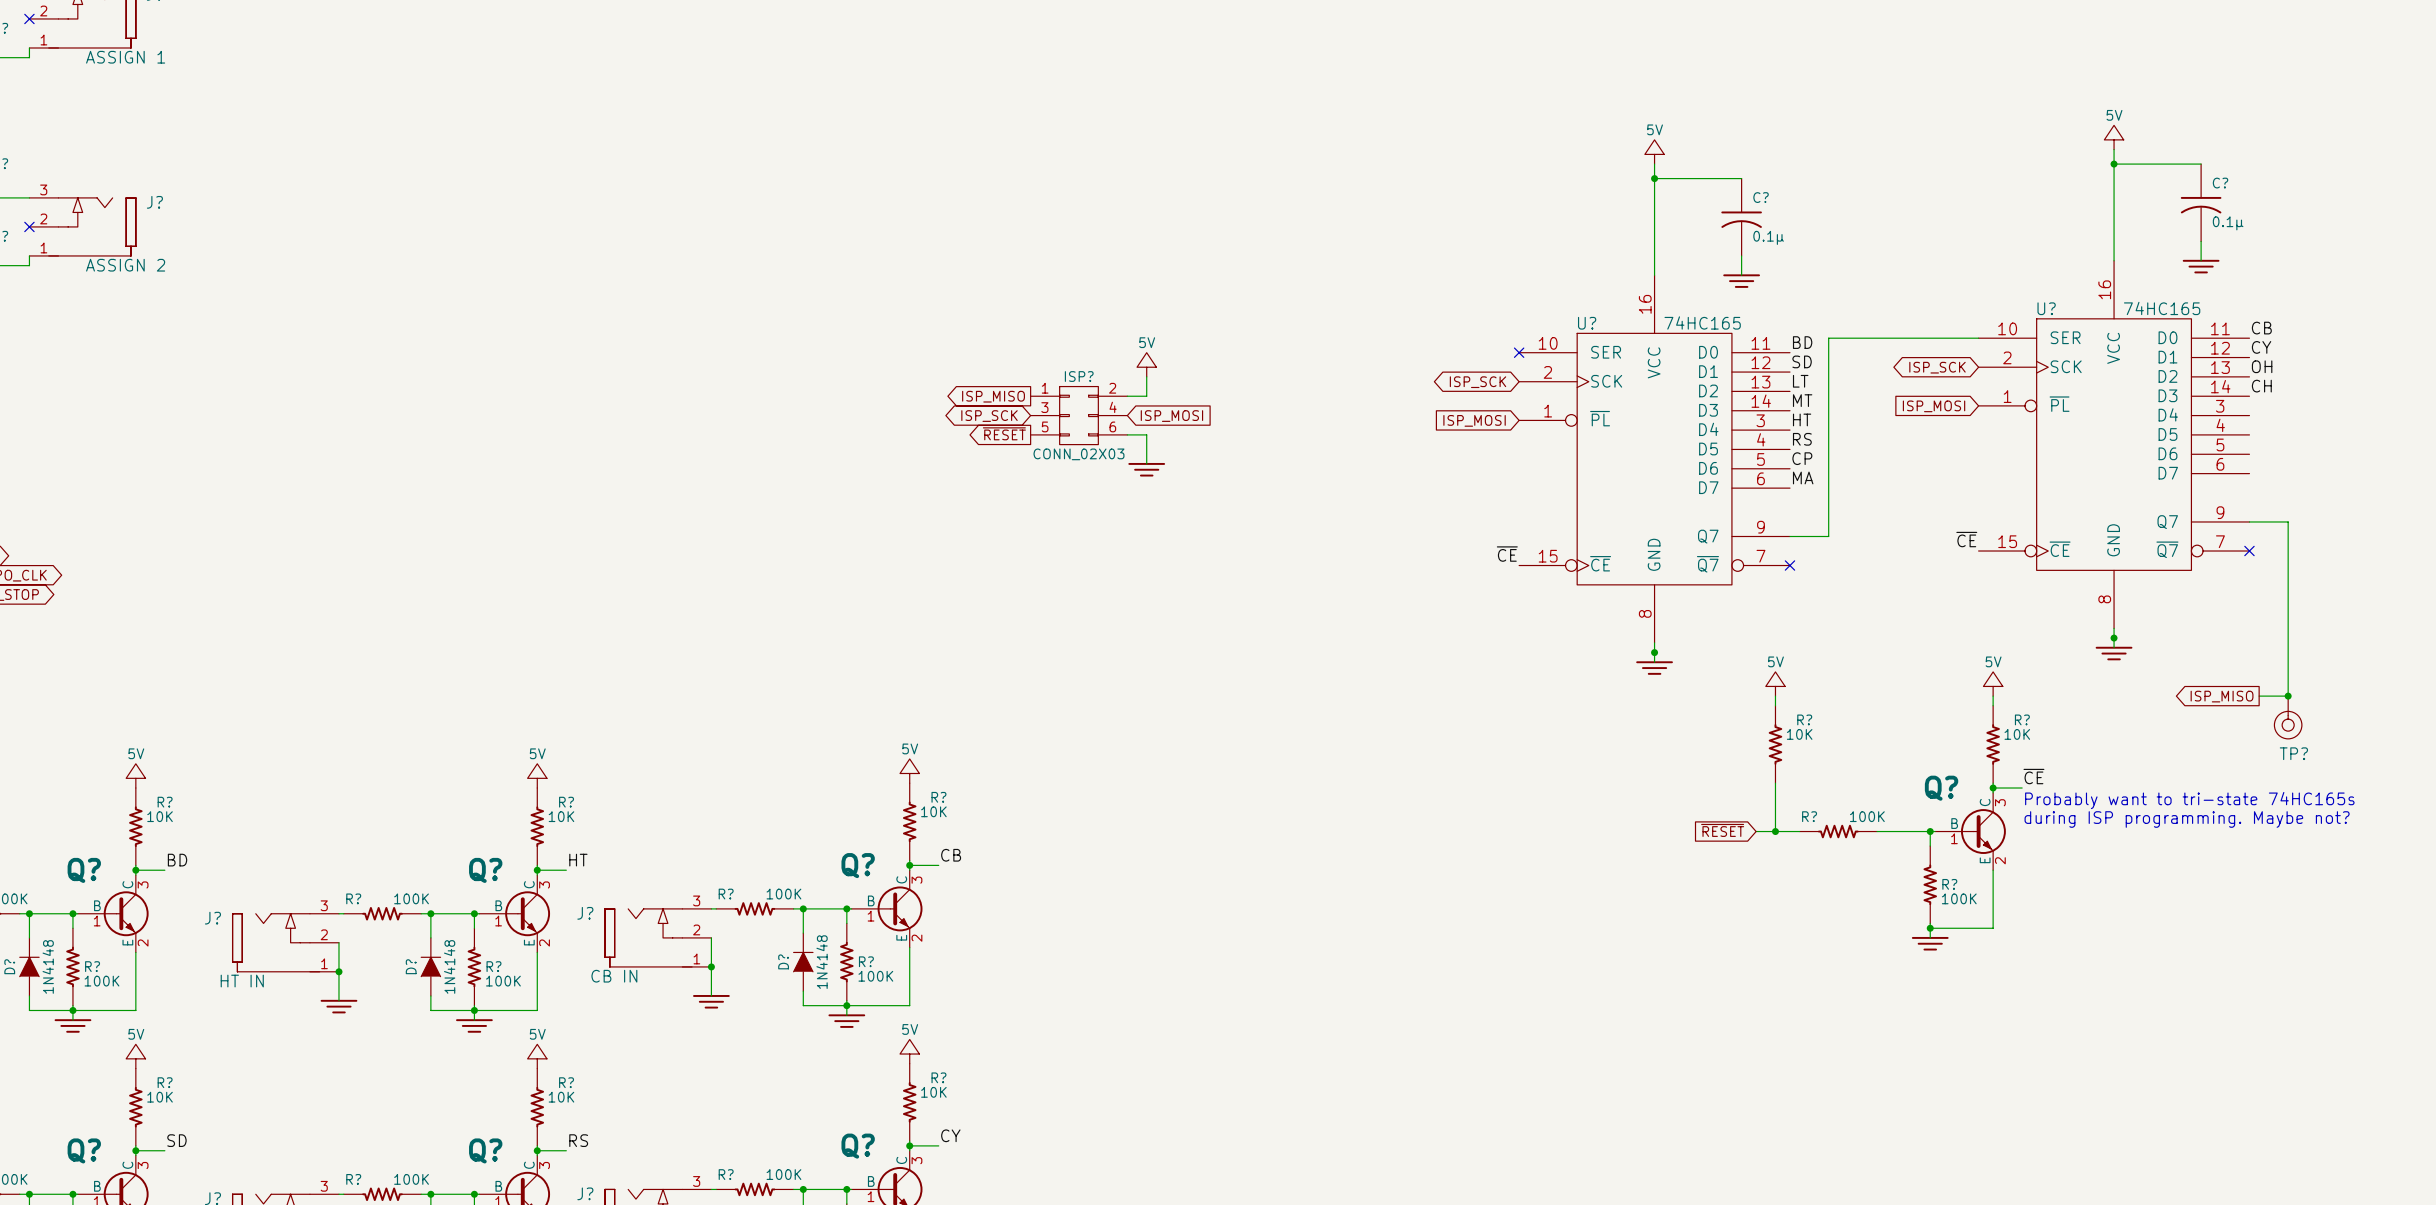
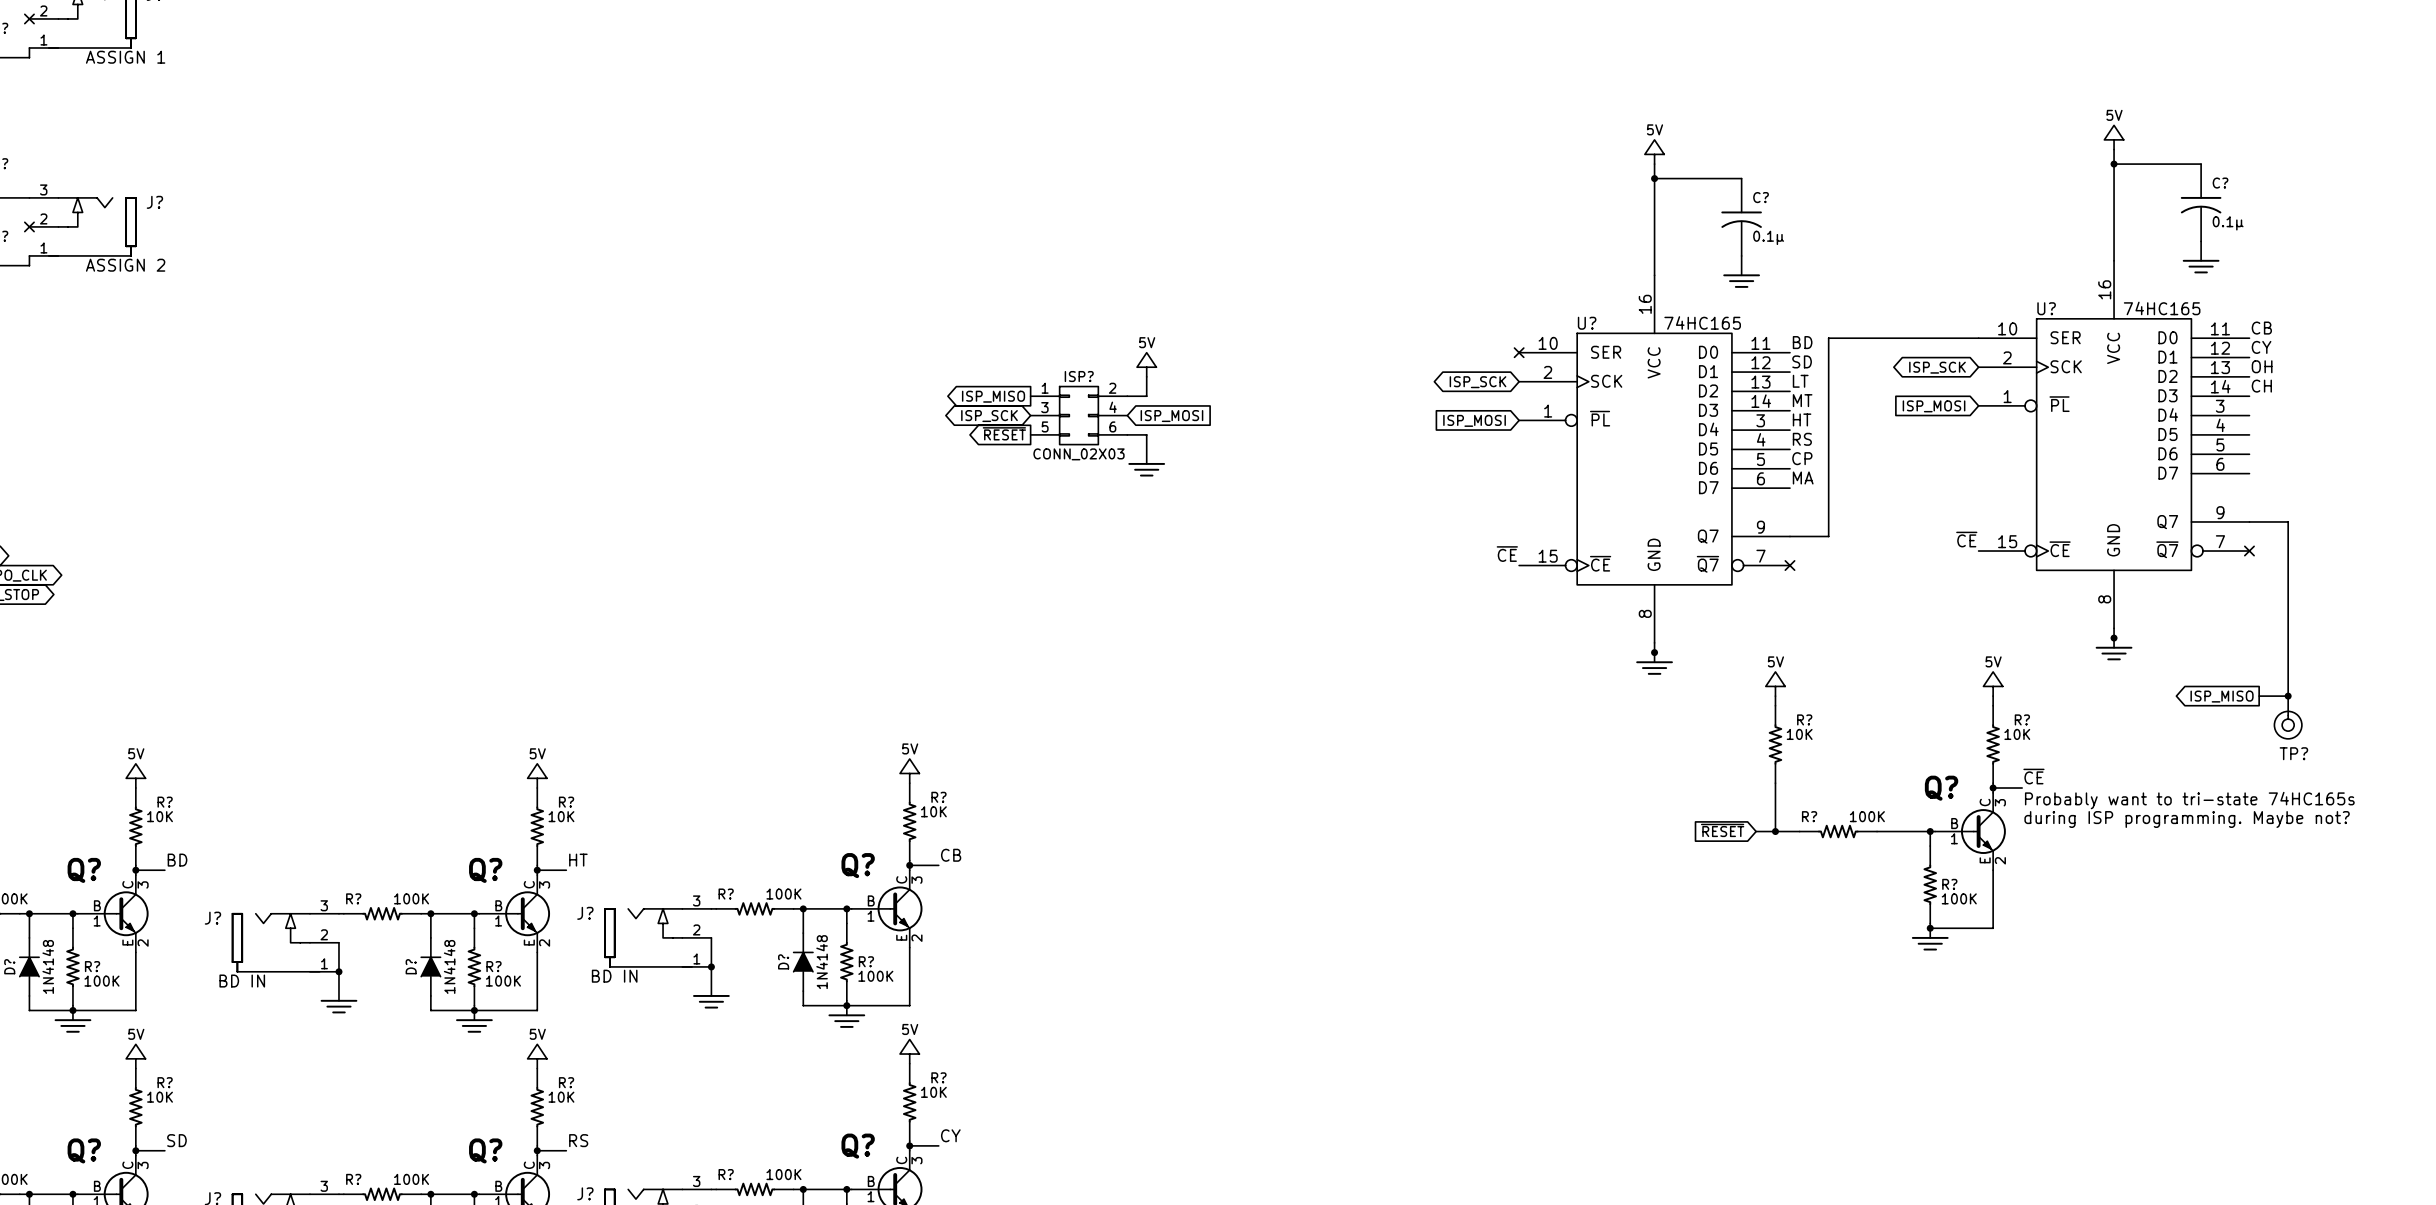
J? value: CB IN (614, 976) -> BD IN (614, 976)
J? value: HT IN (242, 981) -> BD IN (242, 981)

